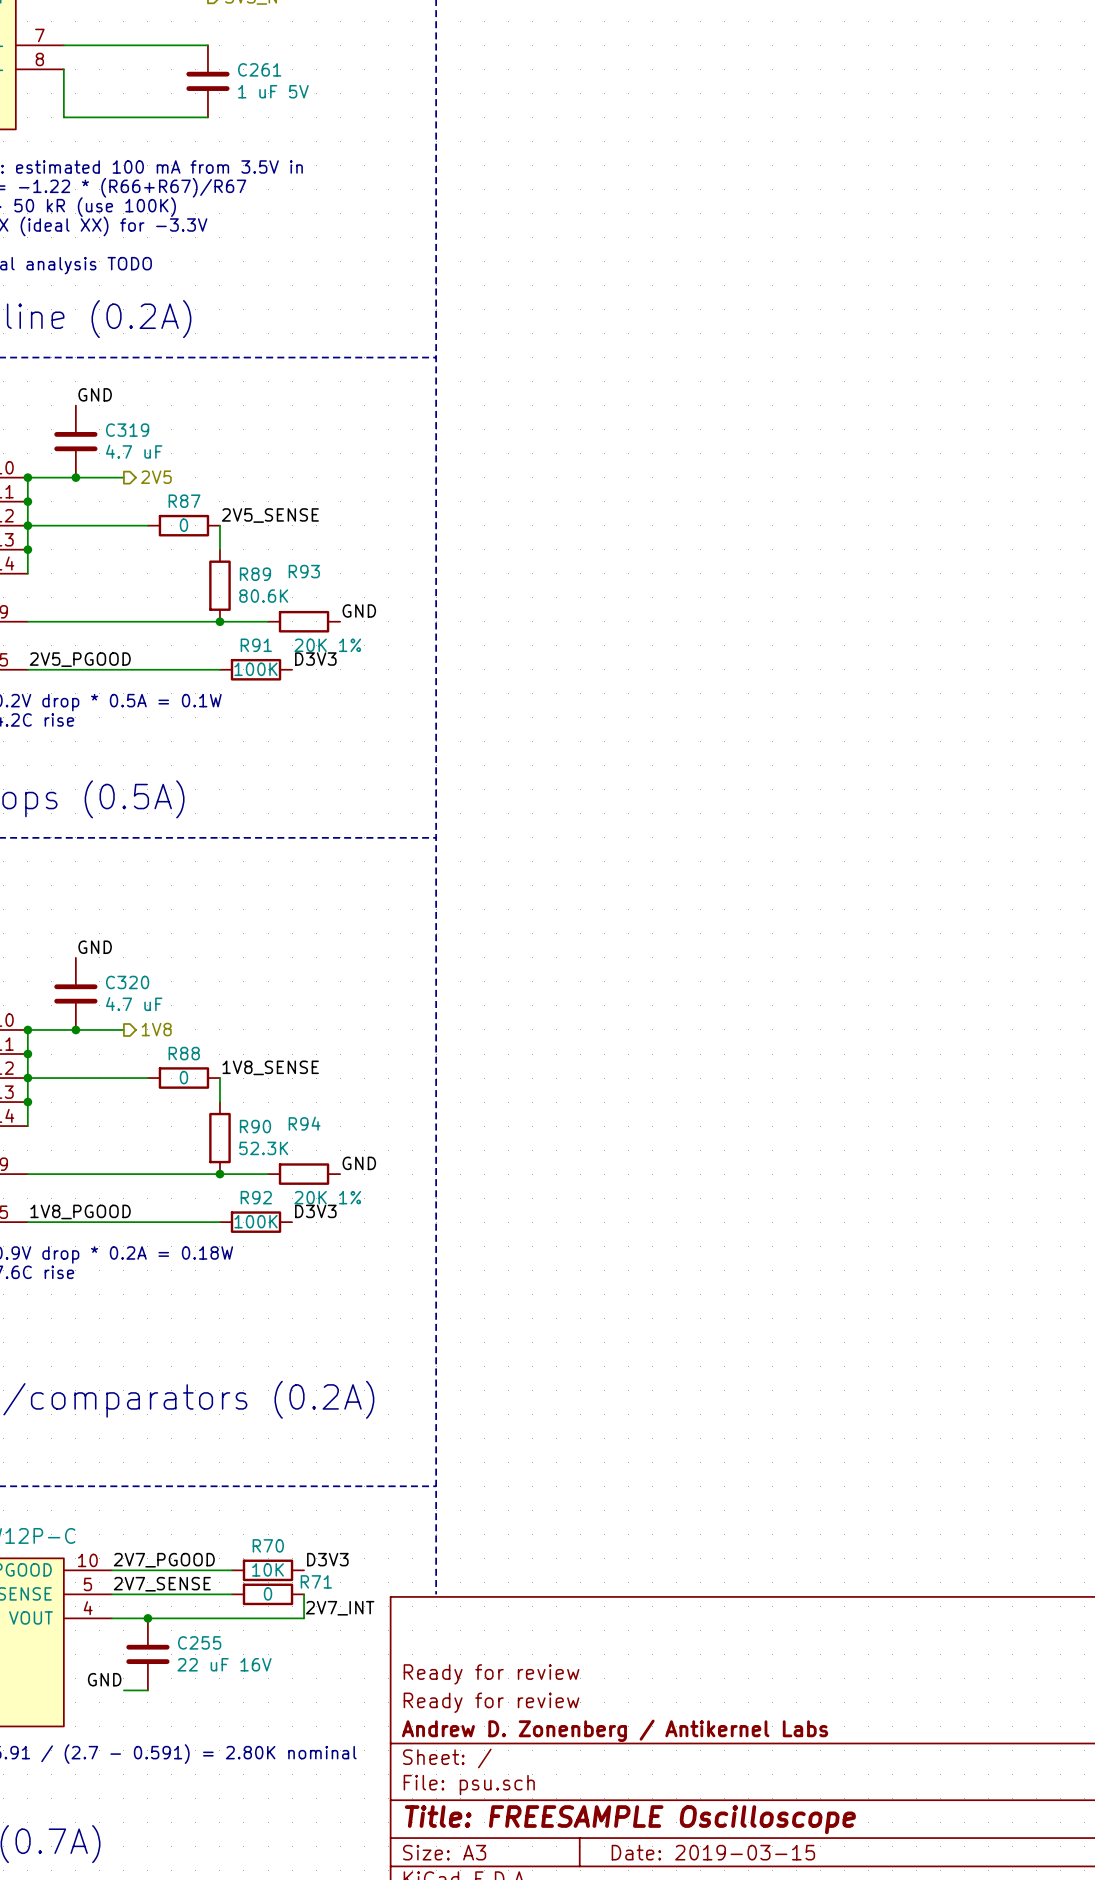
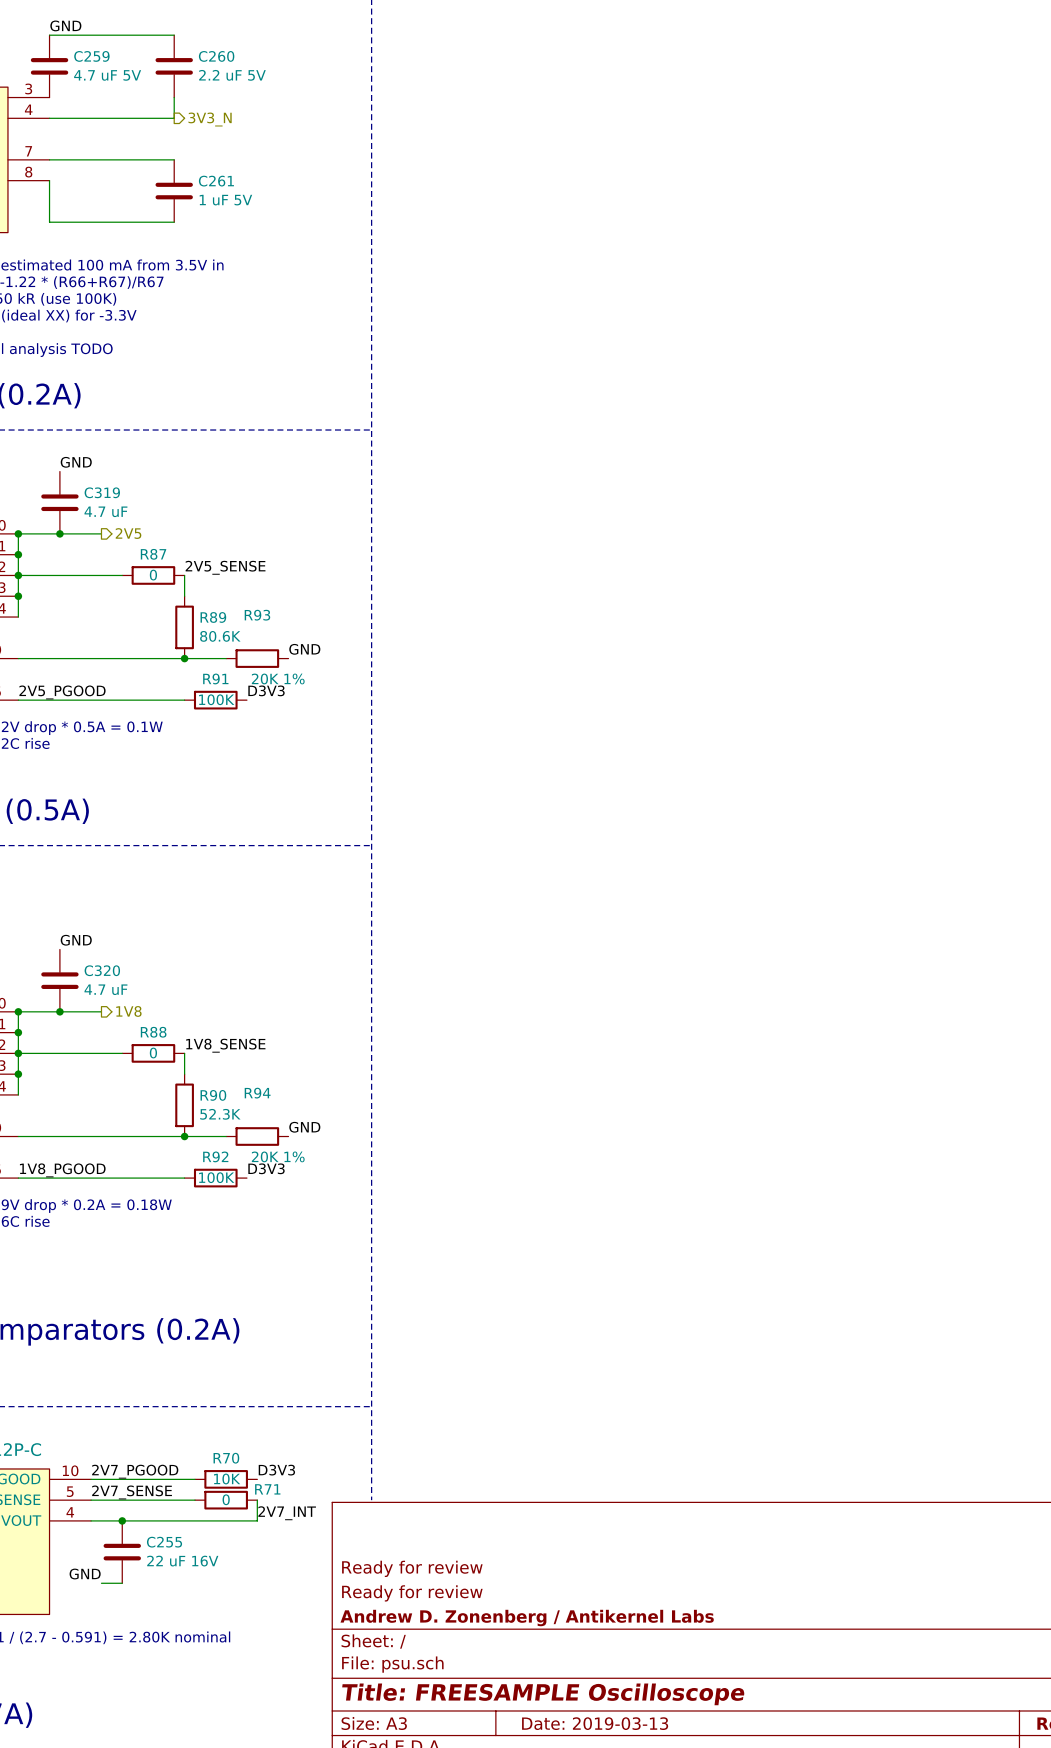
title block: Date: 2019-03-15 (713, 1852) -> Date: 2019-03-13 (595, 1723)

